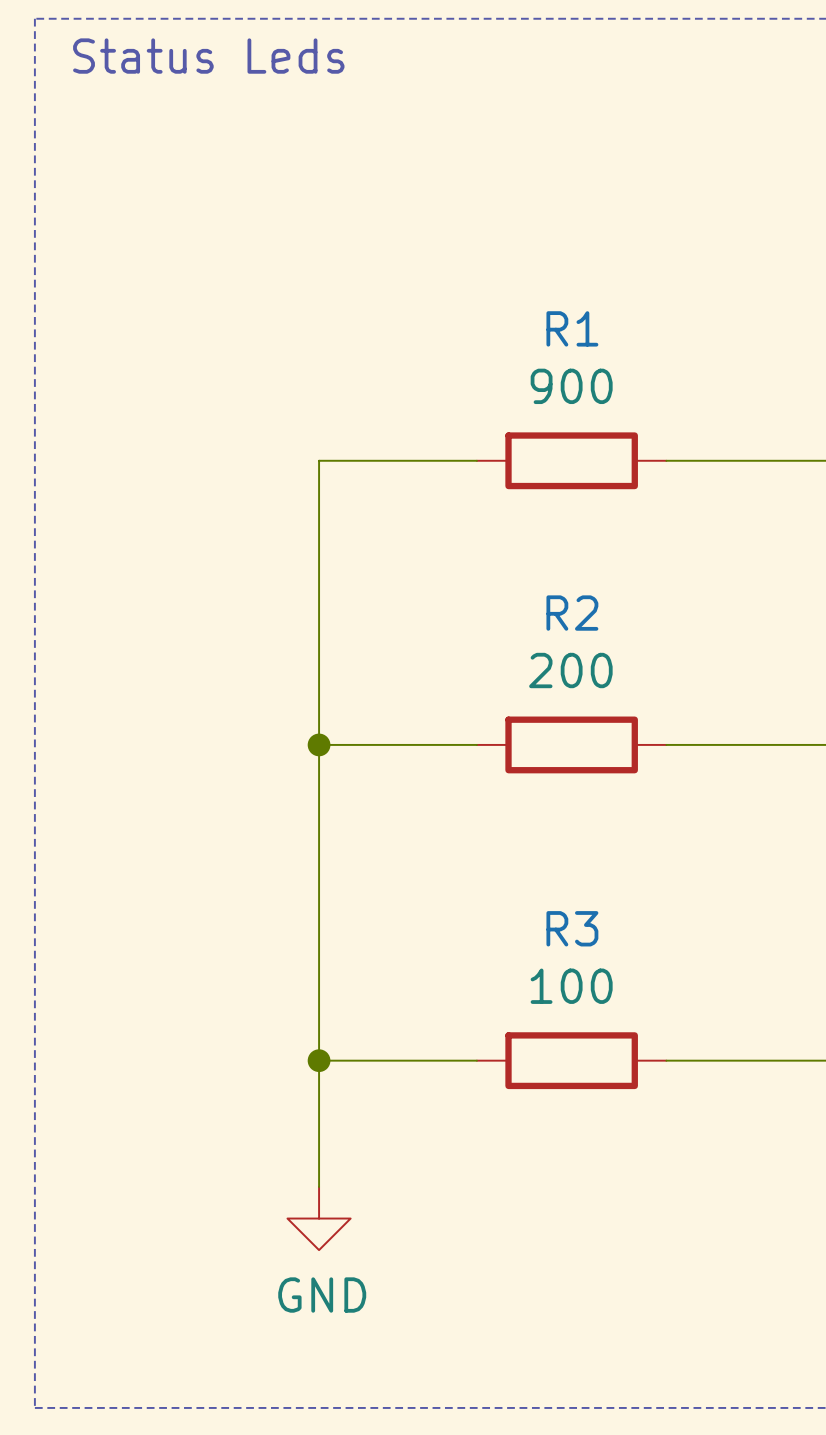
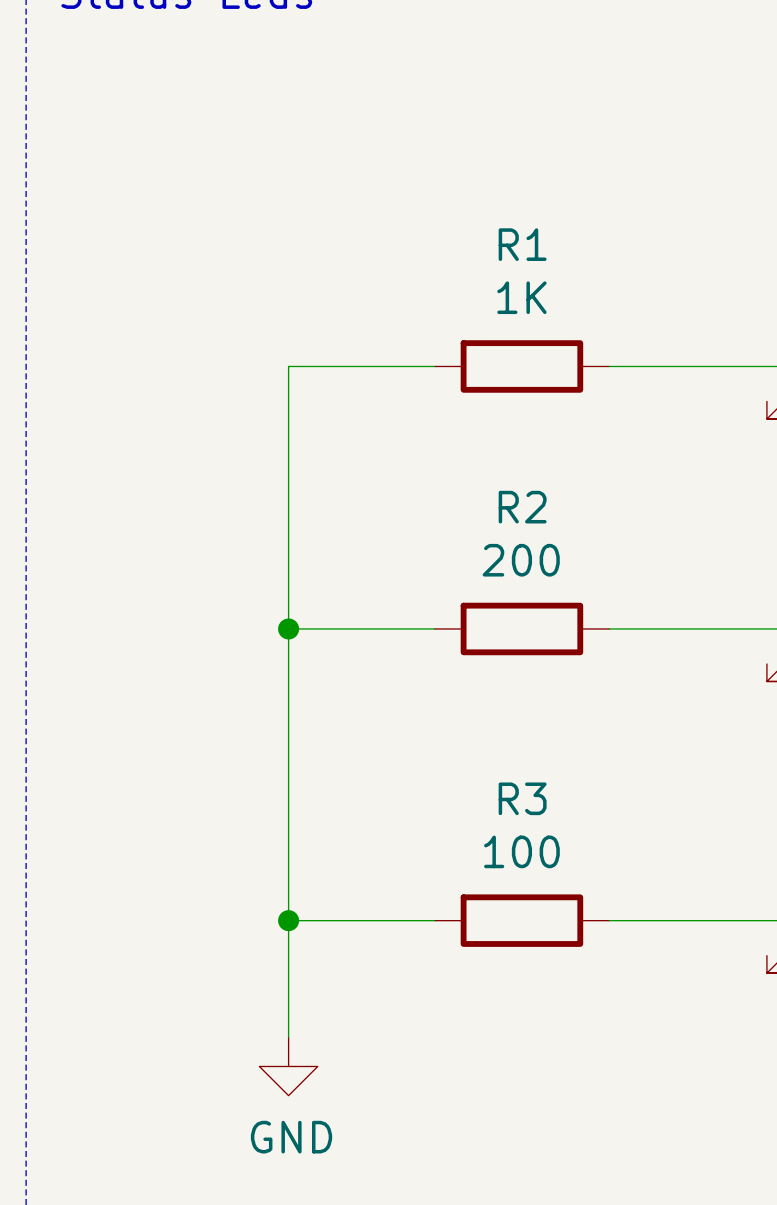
R1 value: 900 (571, 386) -> 1K (521, 297)

